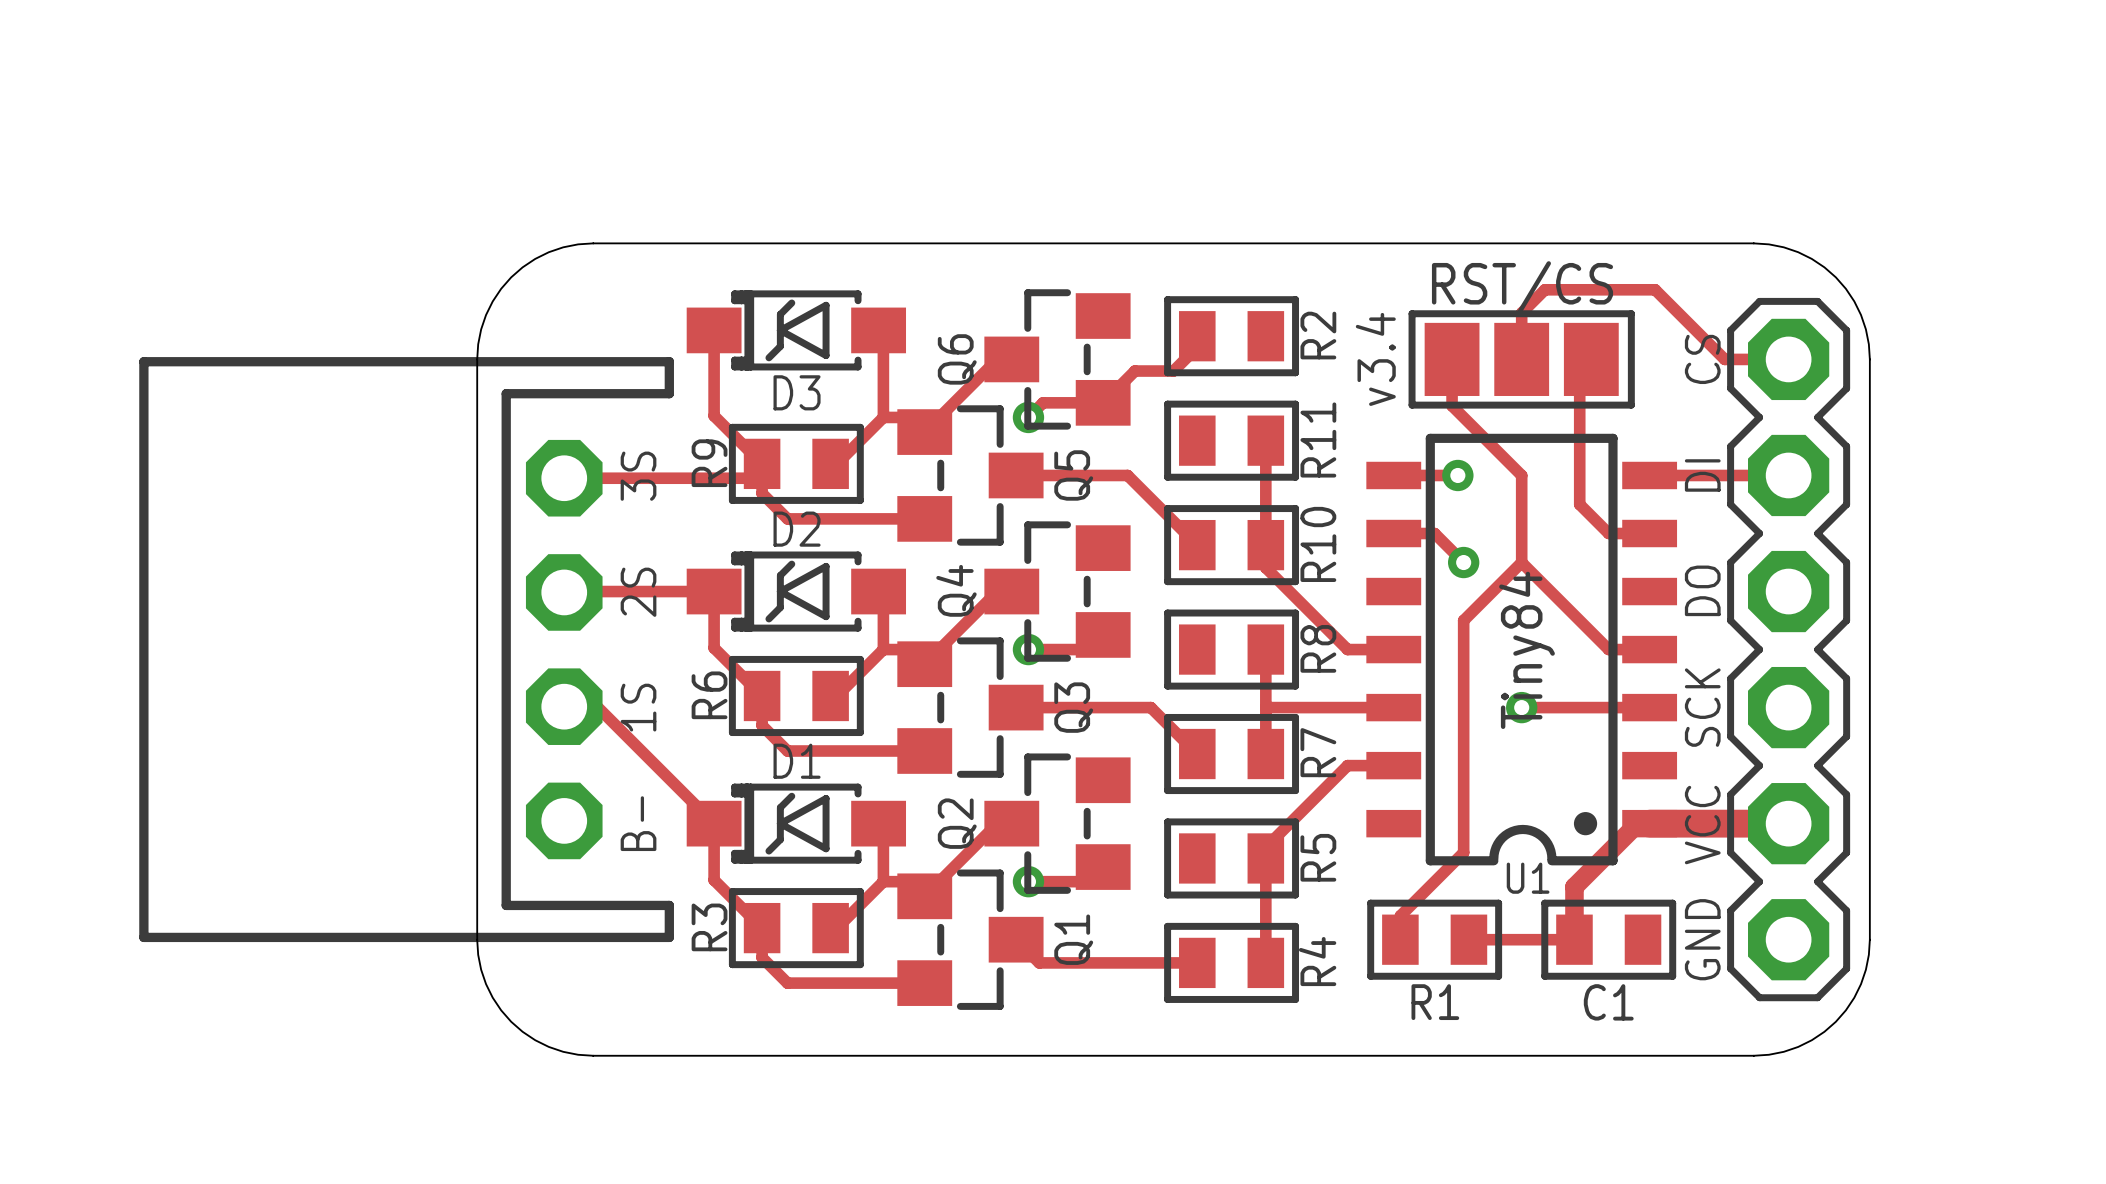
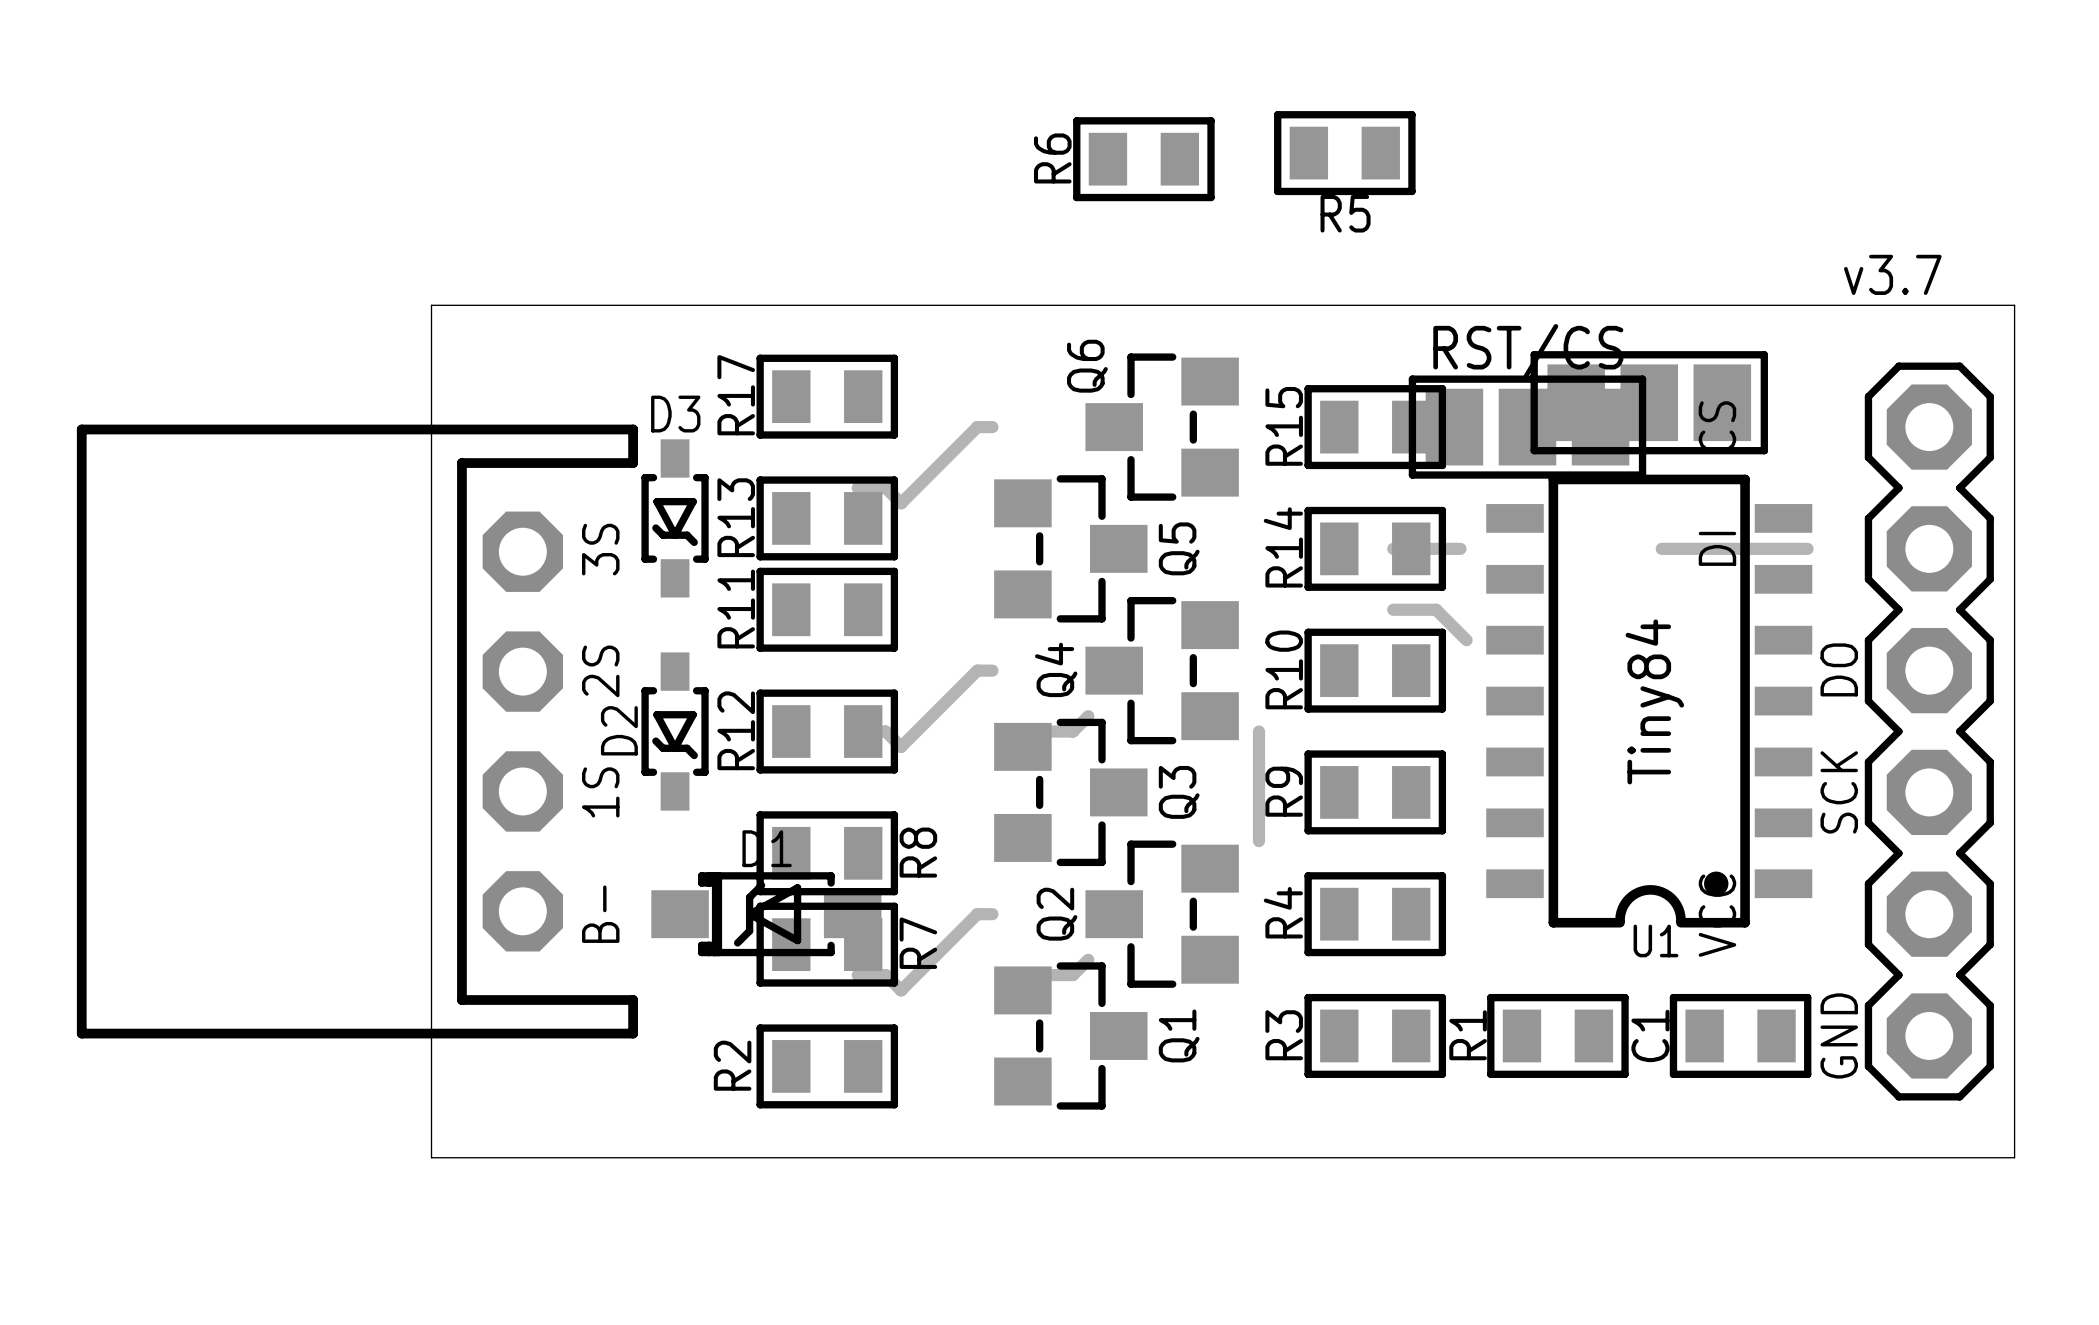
text: none -> v3.7 (1892, 274)
board edge: (593, 243) (563, 247) (548, 252) (522, 267) (511, 277) (501, 288) (486, 315) (481, 329) (477, 359) -> (553, 305) (431, 305) (431, 427)
board edge: (1753, 243) (1783, 247) (1798, 252) (1824, 267) (1835, 277) (1845, 288) (1861, 315) (1865, 329) (1869, 359) (1868, 954) (1861, 984) (1845, 1010) (1835, 1021) (1824, 1031) (1798, 1046) (1783, 1051) (1753, 1055) -> (1771, 305) (2014, 305) (2014, 1157) (1771, 1157)
D3 footprint: [686, 290, 907, 371] -> [641, 439, 709, 598]
track: (714, 330) (714, 415) (762, 463) -> none
R17: none -> (827, 396)
track: (878, 330) (883, 335) (883, 417) (836, 463) (830, 463) -> none
R2 name position: R2 (1318, 335) -> R2 (732, 1065)
track: (1197, 336) (1197, 347) (1173, 371) (1134, 371) (1103, 402) (1043, 402) (1028, 417) -> none
R2 position: (1231, 336) -> (827, 1066)
part: none -> (1649, 402)
Q6 name position: Q6 (957, 359) -> Q6 (1087, 366)
Q6 position: (1057, 359) -> (1162, 427)
text: v3.4 (1375, 359) -> none
R15: none -> (1375, 427)
track: (1452, 359) (1452, 405) (1521, 475) (1521, 562) -> none
track: (1521, 359) (1521, 313) (1544, 289) (1655, 289) (1724, 359) (1788, 359) -> none
track: (1591, 359) (1579, 371) (1579, 504) (1608, 533) (1649, 533) -> none
D3 name position: D3 (797, 392) -> D3 (675, 414)
via: (1028, 417) -> none
R11 name position: R11 (1318, 439) -> R11 (736, 609)
R11 position: (1231, 440) -> (827, 609)
track: (1265, 440) (1265, 567) (1347, 649) (1393, 649) -> none
R13: none -> (827, 518)
track: (762, 463) (762, 493) (787, 518) (924, 518) -> none
track: (762, 463) (747, 478) (564, 478) -> none
R9 position: (796, 463) -> (1375, 792)
Q5 position: (970, 475) -> (1070, 548)
track: (1016, 475) (1127, 475) (1197, 545) -> none
R14: none -> (1375, 548)
via: (1457, 475) -> none
R10 name position: R10 (1318, 544) -> R10 (1284, 669)
R10 position: (1231, 545) -> (1375, 670)
D2 footprint: [686, 551, 907, 632] -> [641, 652, 709, 811]
via: (1463, 562) -> none
track: (1521, 562) (1608, 649) (1649, 649) -> none
track: (1521, 562) (1463, 620) (1463, 852) (1400, 915) (1400, 939) -> none
text position: DO (1702, 590) -> DO (1839, 669)
track: (878, 591) (883, 596) (883, 649) (836, 695) (830, 695) -> none
Q4 position: (1057, 591) -> (1162, 670)
track: (564, 592) (714, 591) (714, 648) (762, 695) (762, 725) (787, 751) (924, 751) -> none
R12: none -> (827, 731)
via: (1028, 649) -> none
R8 position: (1231, 649) -> (827, 853)
U1 position: (1521, 649) -> (1649, 701)
part position: (1788, 649) -> (1929, 731)
R6 position: (796, 695) -> (1143, 159)
track: (564, 706) (597, 706) (714, 823) (714, 880) (762, 928) (762, 957) (787, 983) (924, 983) -> none
Q3 position: (970, 707) -> (1070, 792)
track: (1016, 707) (1150, 707) (1197, 754) -> none
track: (1265, 707) (1393, 707) -> none
track: (1521, 707) (1649, 707) -> none
via: (1521, 707) -> none
text position: SCK (1702, 707) -> SCK (1839, 792)
R7 position: (1231, 754) -> (827, 944)
track: (1393, 765) (1347, 765) (1265, 847) (1265, 962) -> none
track: (878, 823) (883, 828) (883, 881) (836, 928) (830, 928) -> none
Q2 position: (1057, 823) -> (1162, 914)
track: (1788, 823) (1637, 823) (1574, 886) (1574, 939) (1468, 939) -> none
R5 name rotation: 0° (1318, 857) -> 90° clockwise (1345, 213)
R5 name position: R5 (1318, 857) -> R5 (1345, 213)
R5 position: (1231, 858) -> (1344, 153)
via: (1028, 881) -> none
R3 position: (796, 928) -> (1375, 1035)
board edge: (477, 939) (481, 969) (486, 984) (501, 1010) (511, 1021) (522, 1031) (548, 1046) (563, 1051) (593, 1055) -> (431, 1035) (431, 1157) (553, 1157)
Q1 position: (970, 939) -> (1070, 1035)
track: (1016, 939) (1039, 962) (1197, 962) -> none
R1 position: (1434, 939) -> (1557, 1035)
C1 position: (1608, 939) -> (1740, 1035)
text position: GND (1702, 939) -> GND (1839, 1035)
R4 name position: R4 (1317, 961) -> R4 (1283, 912)
R4 position: (1231, 962) -> (1375, 914)
R1 name rotation: 0° (1435, 1002) -> 90° counterclockwise (1468, 1035)
C1 name rotation: 0° (1608, 1002) -> 90° counterclockwise (1650, 1035)

